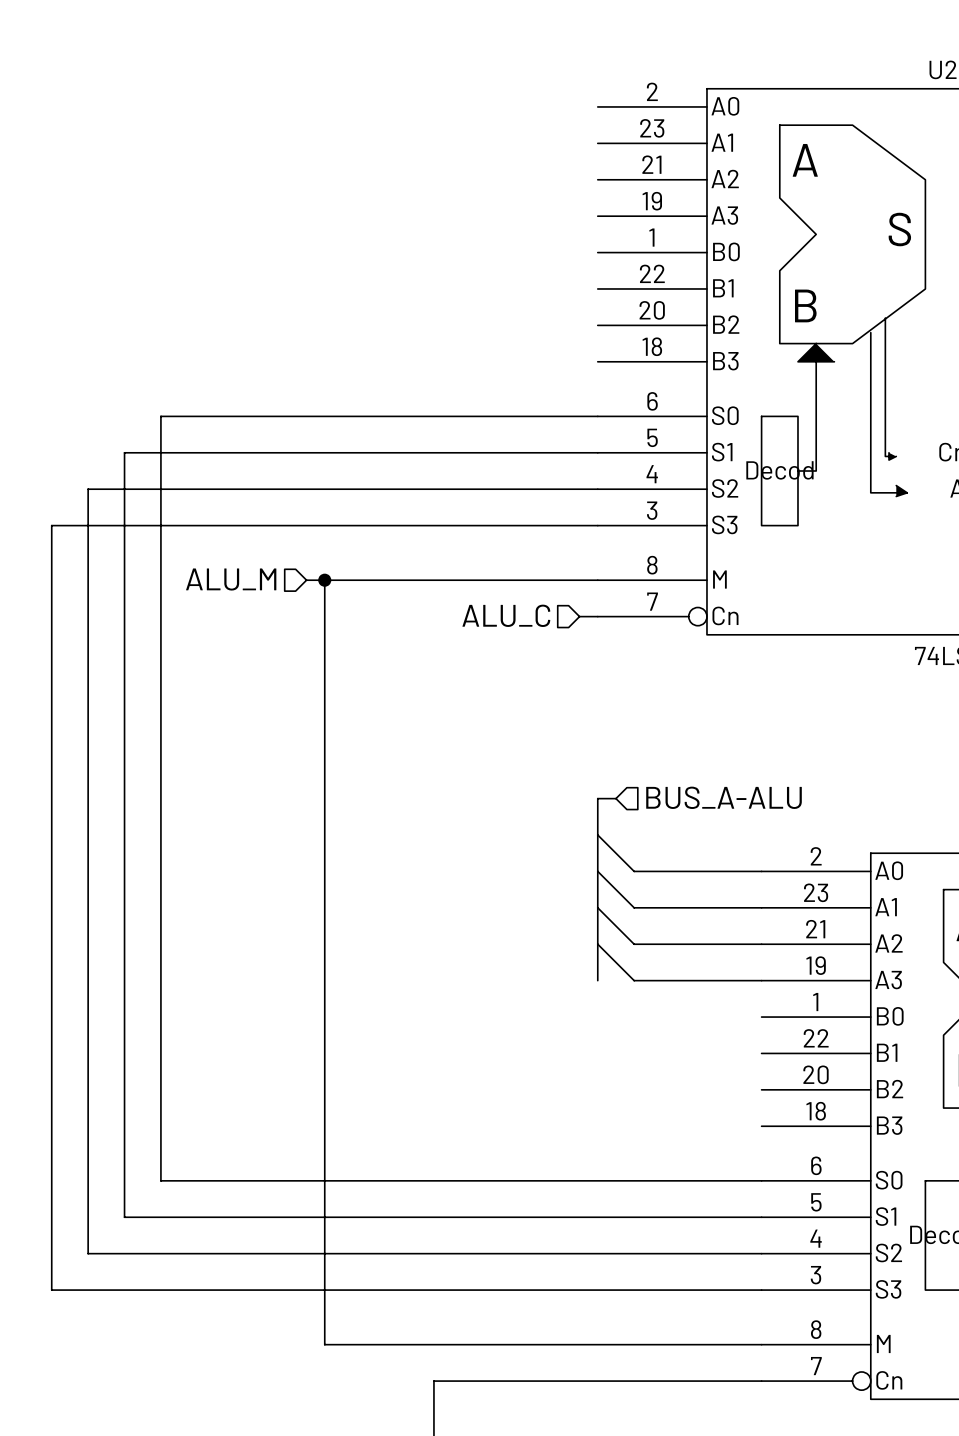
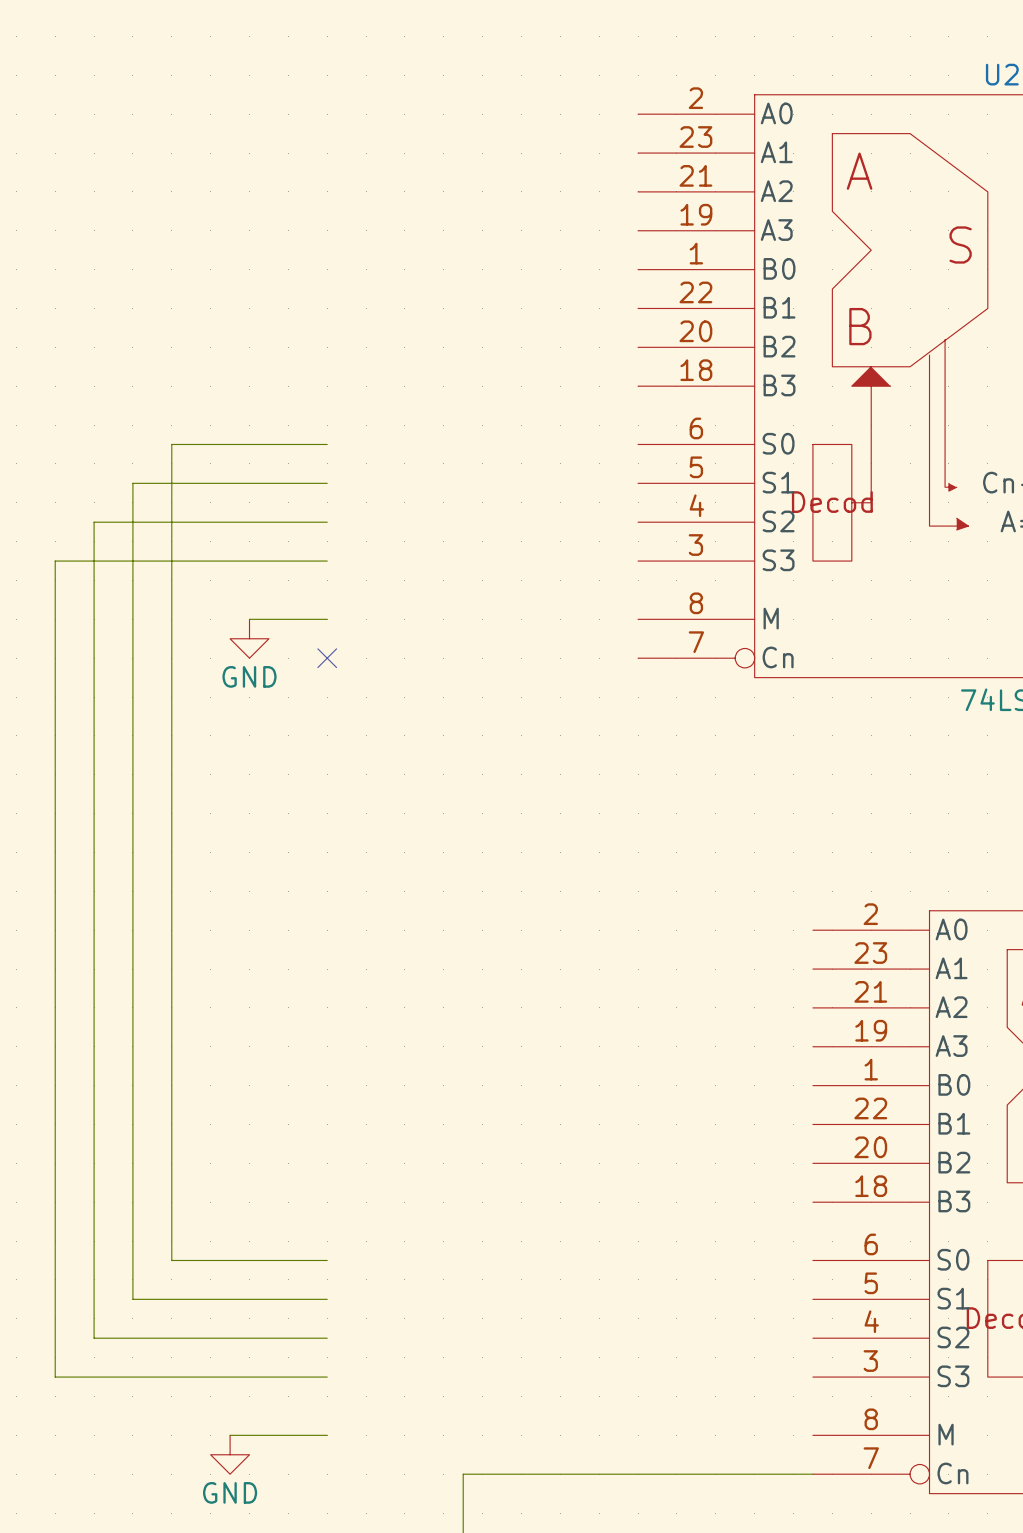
wire: (306, 416) (597, 416) -> none
wire: (306, 452) (597, 452) -> none
wire: (306, 489) (597, 489) -> none
wire: (306, 525) (597, 525) -> none
hierarchical label: ALU_M (231, 579) -> none
wire: (306, 580) (597, 580) -> (327, 619) (249, 619)
wire: (324, 580) (324, 1344) (761, 1344) -> none
junction: (324, 580) -> none
power symbol: none -> GND (249, 638)
hierarchical label: ALU_C (506, 615) -> none
no-connect mark: none -> (327, 658)
wire: (579, 616) (597, 616) -> none
hierarchical label: BUS_A-ALU (724, 797) -> none
bus: (615, 798) (597, 798) (597, 980) -> none
wire: (597, 835) (634, 871) (761, 871) -> none
wire: (597, 871) (634, 907) (761, 907) -> none
wire: (597, 907) (634, 944) (761, 944) -> none
wire: (597, 944) (634, 980) (761, 980) -> none
wire: (306, 1180) (761, 1180) -> none
wire: (306, 1217) (761, 1217) -> none
wire: (306, 1253) (761, 1253) -> none
wire: (306, 1290) (761, 1290) -> none
wire: none -> (230, 1435) (327, 1435)
power symbol: none -> GND (230, 1454)

